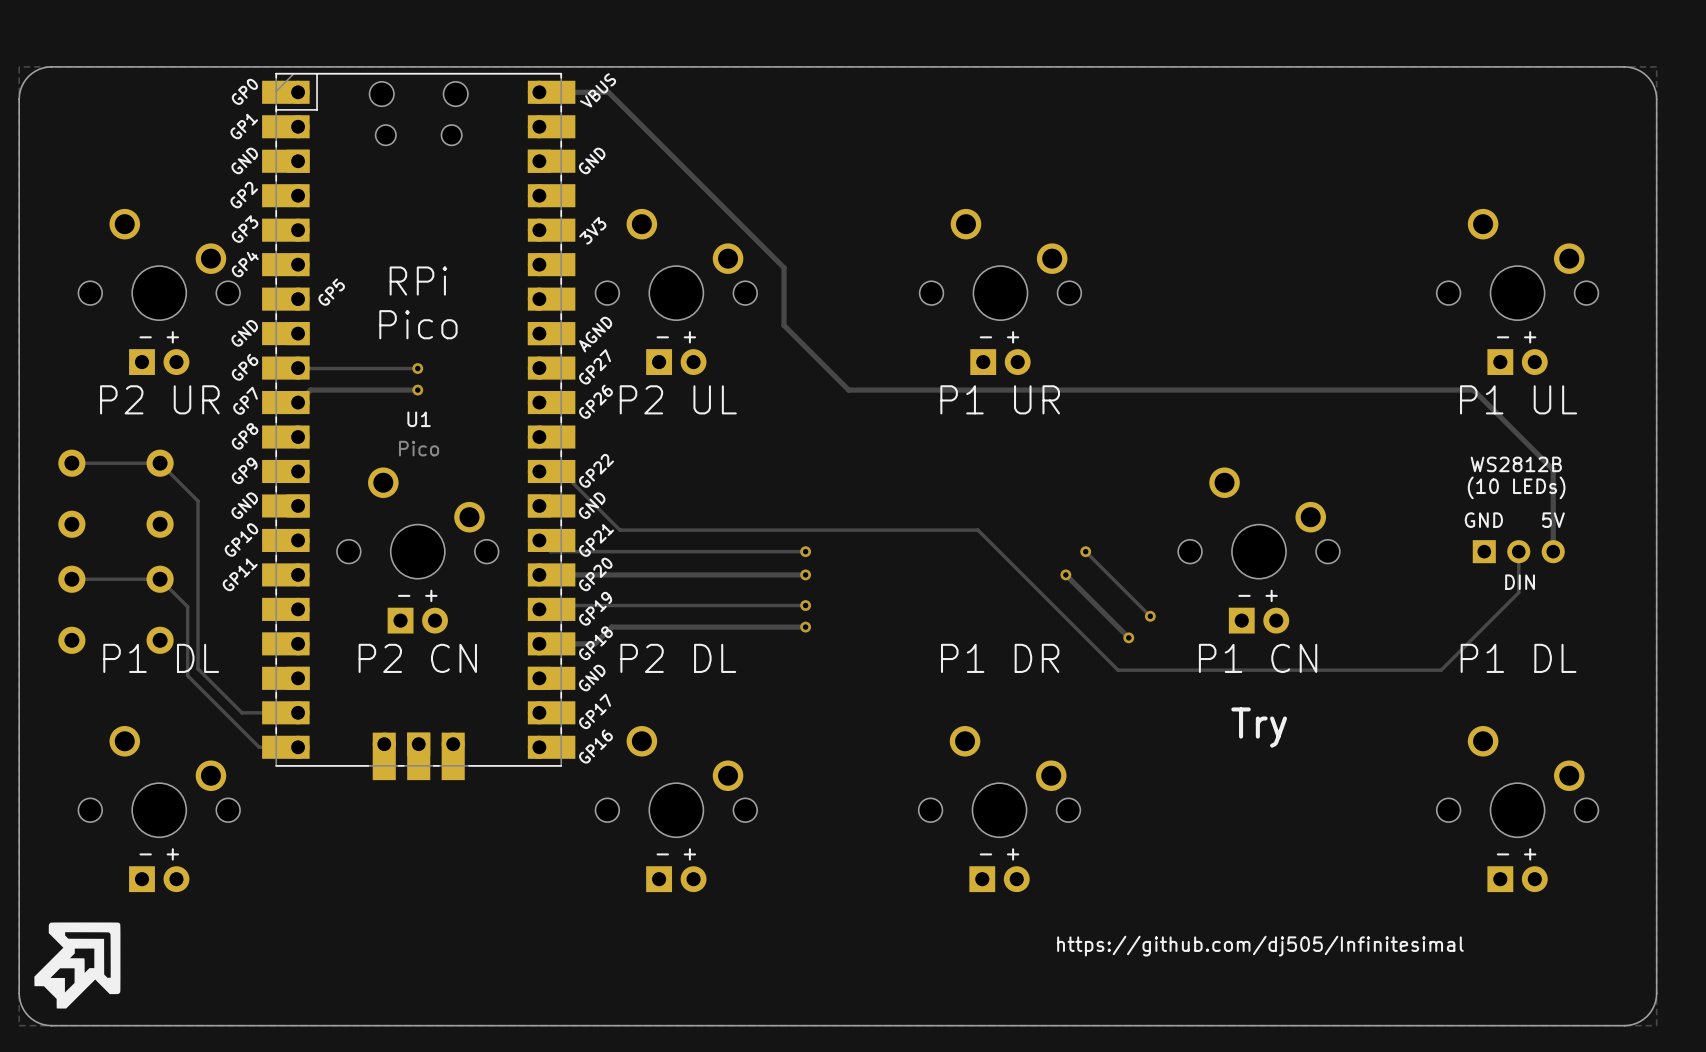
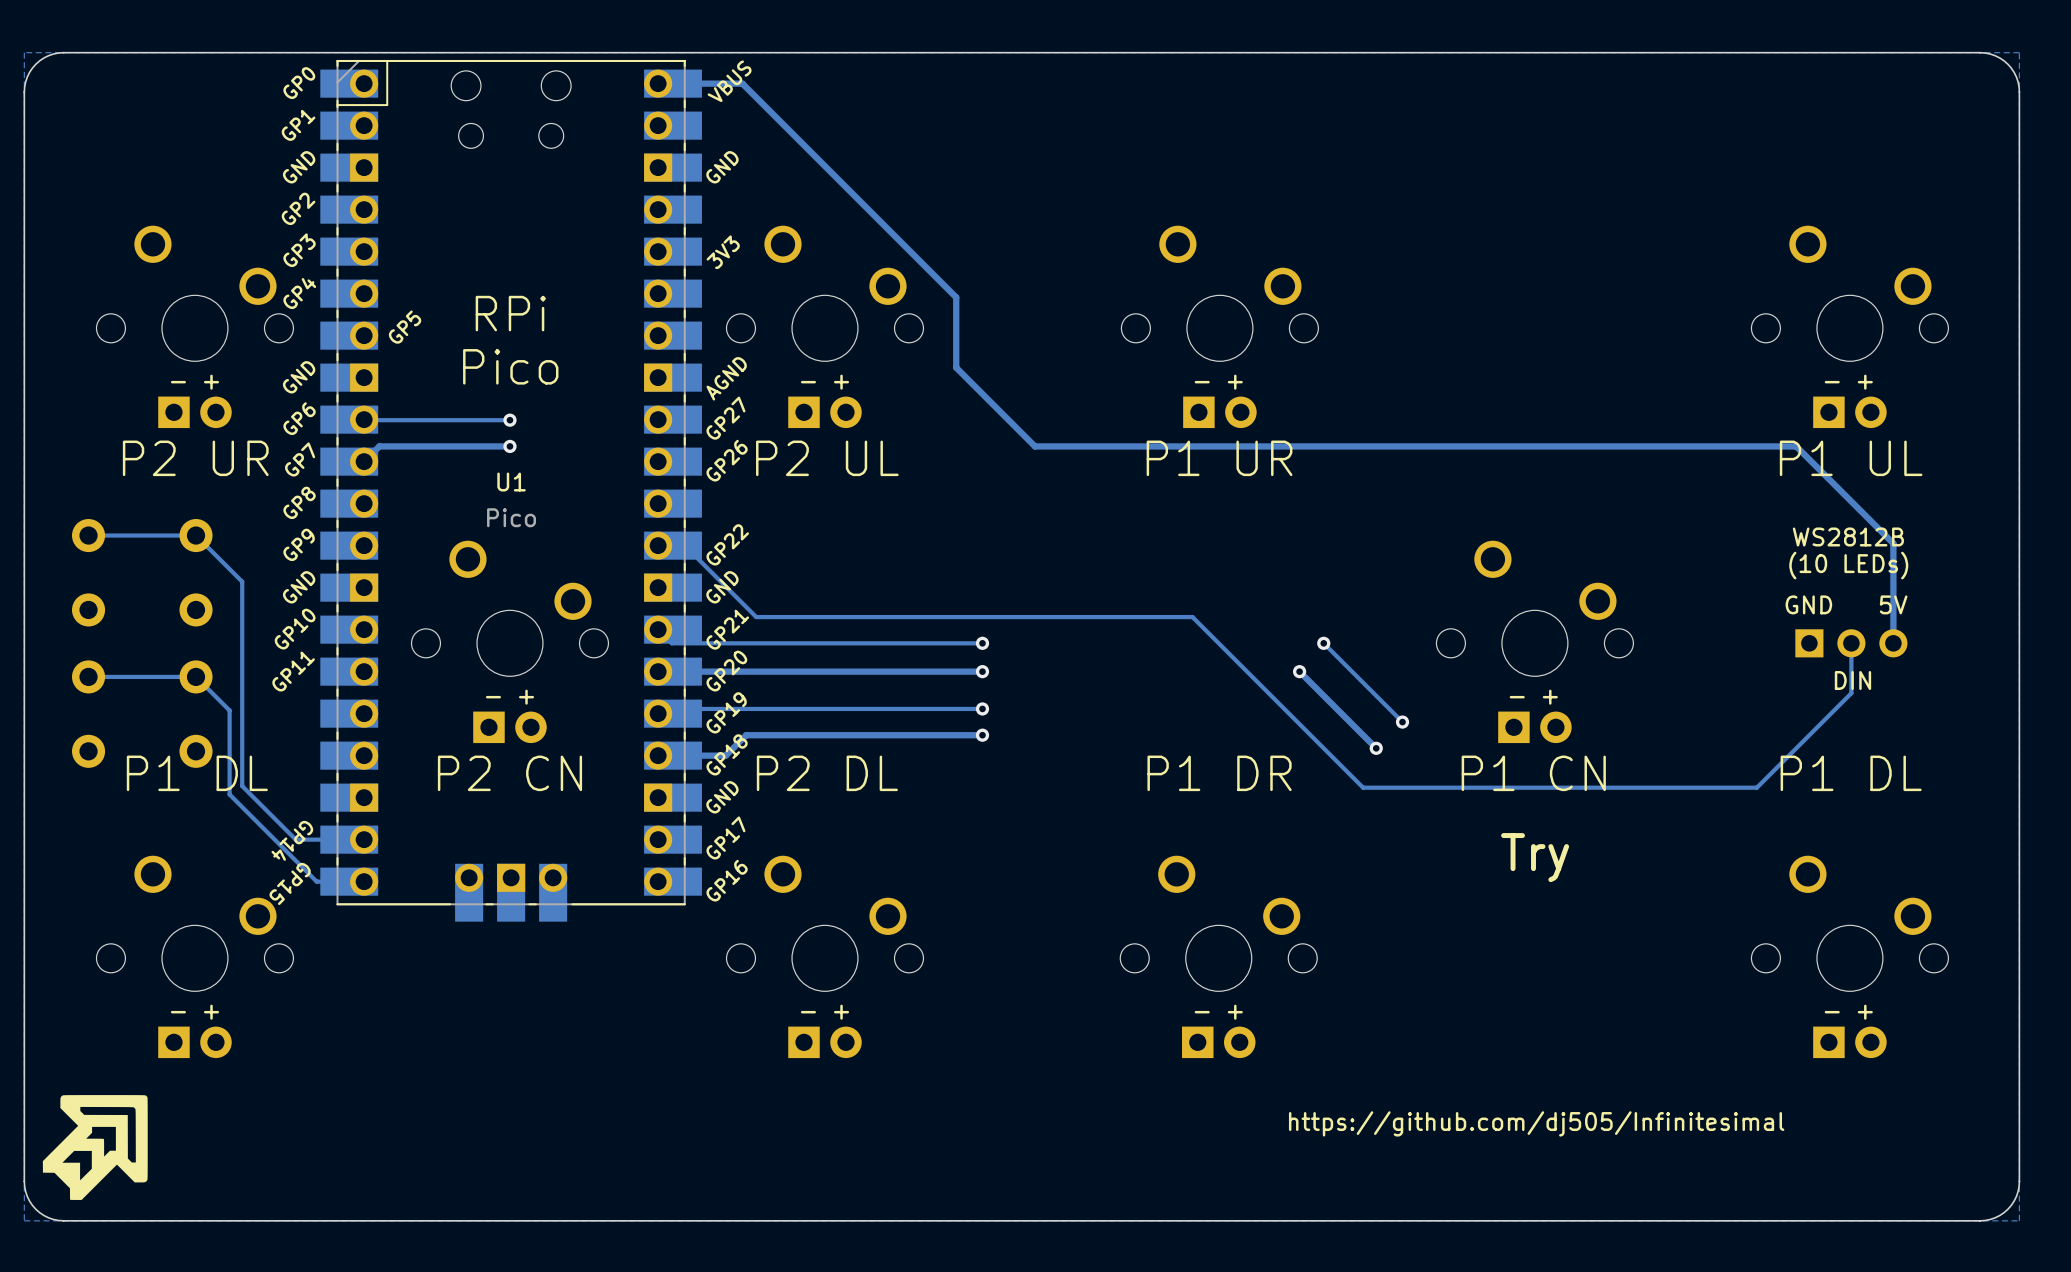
text: none -> GP14 (292, 840)
text: none -> GP15 (290, 883)

